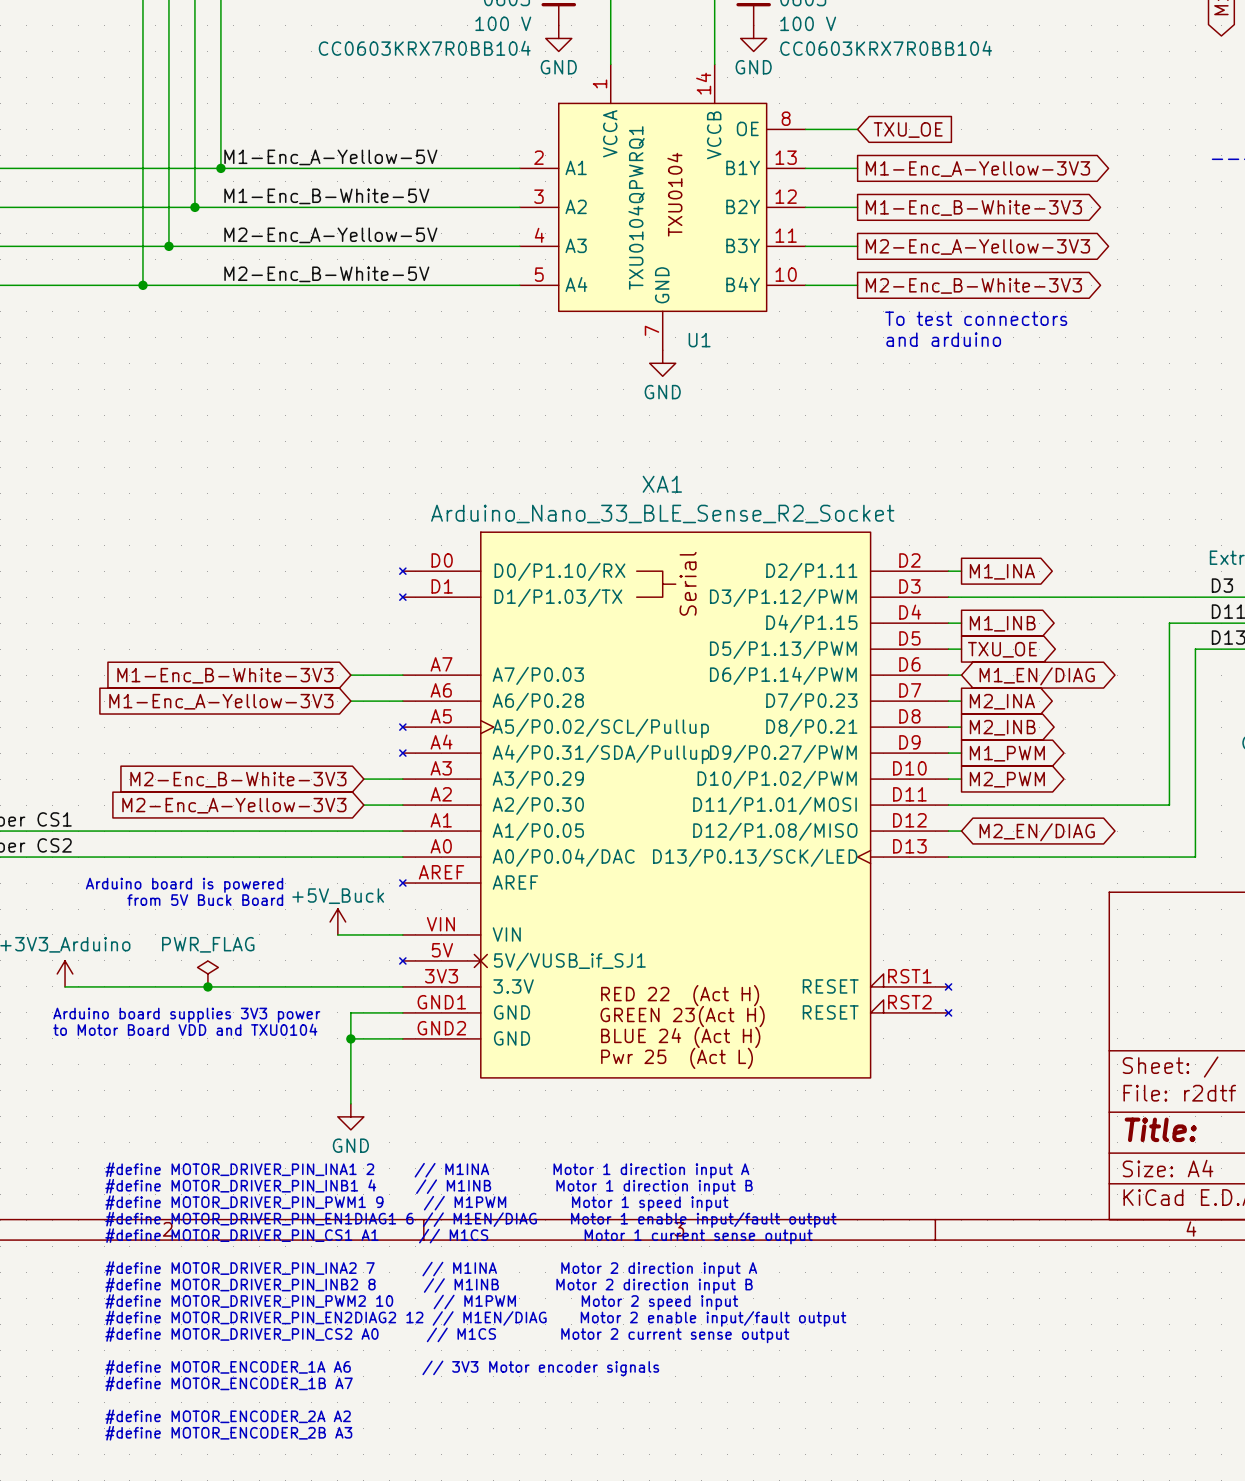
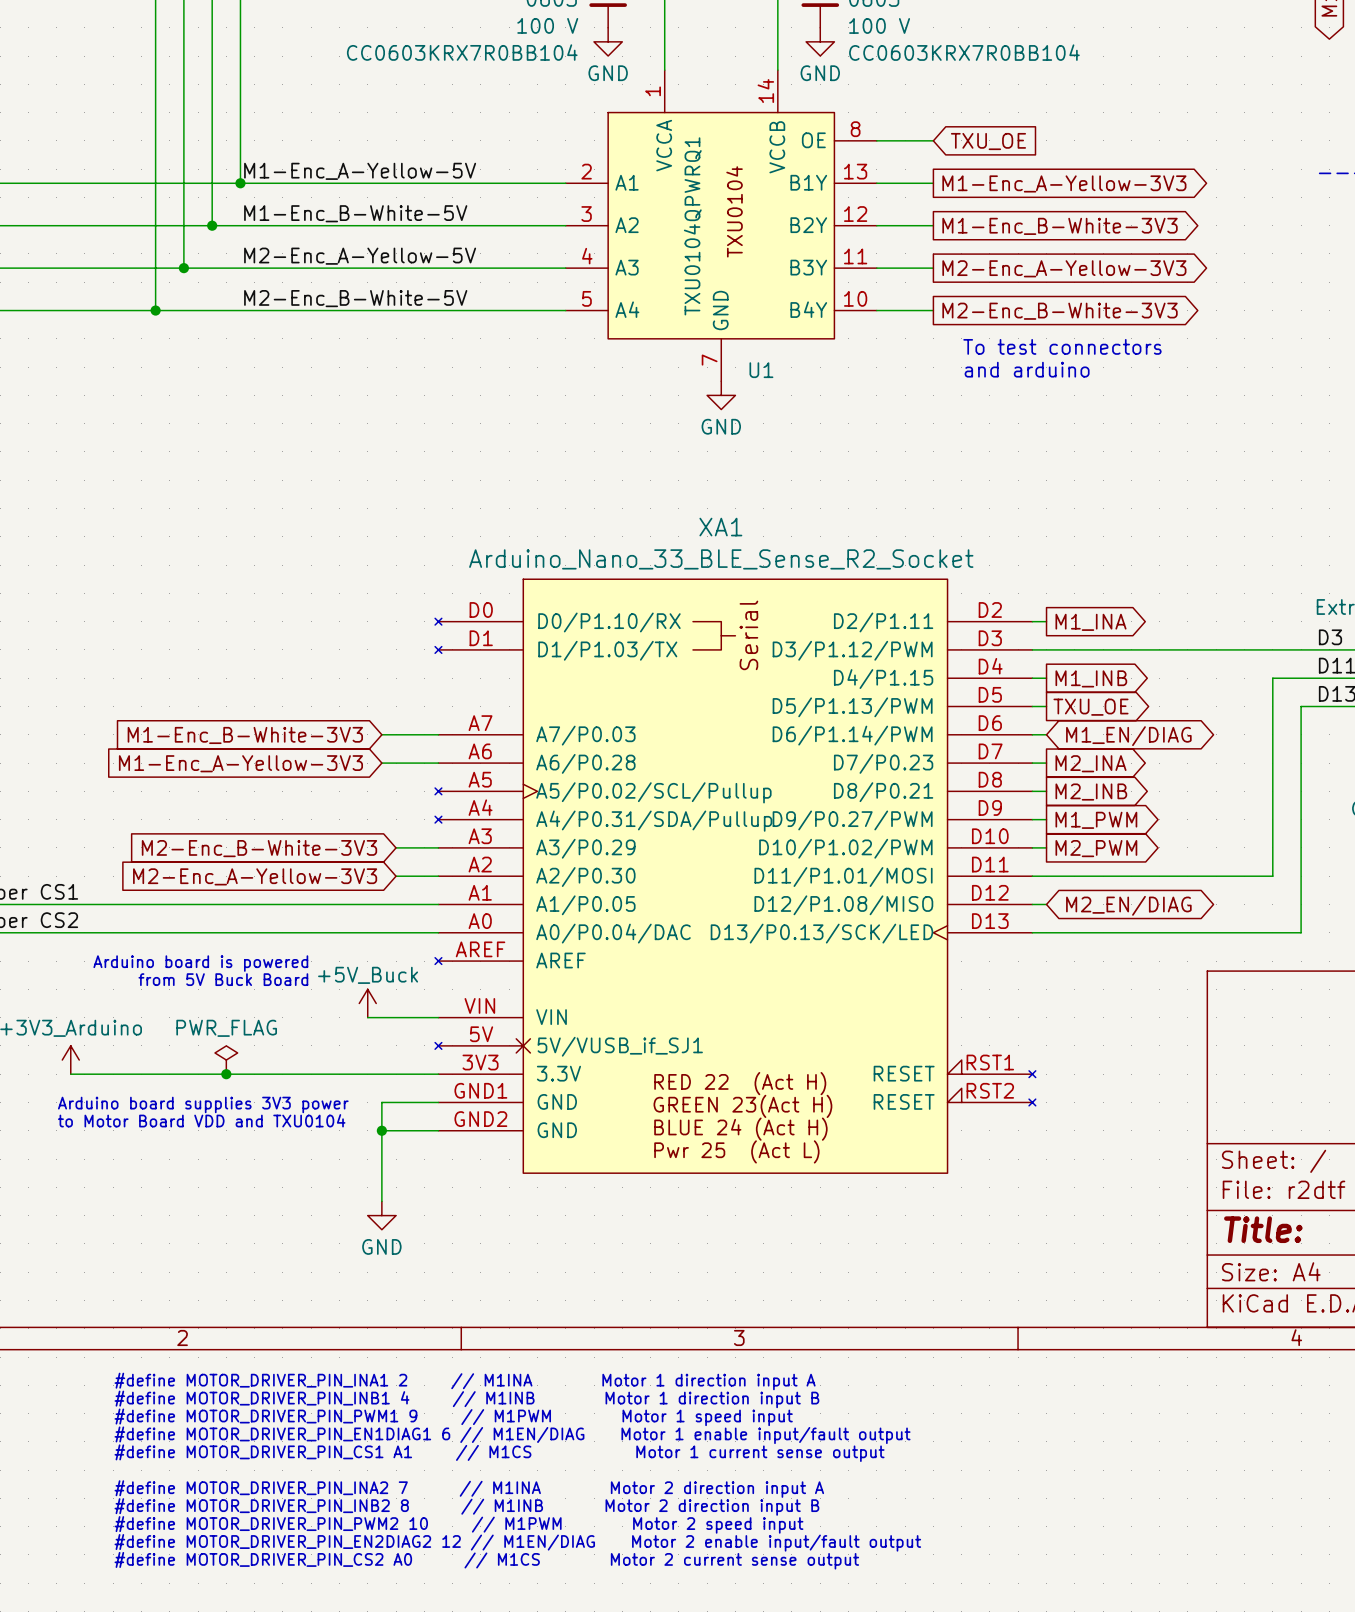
text: #define MOTOR_DRIVER_PIN_INA1 2 // M1INA Motor 1 direction input A (427, 1170) -> none
text: #define MOTOR_DRIVER_PIN_INB1 4 // M1INB Motor 1 direction input B (429, 1186) -> none
text: #define MOTOR_DRIVER_PIN_PWM1 9 // M1PWM Motor 1 speed input (416, 1203) -> none
text: #define MOTOR_DRIVER_PIN_EN1DIAG1 6 // M1EN/DIAG Motor 1 enable input/fault output (470, 1219) -> none
text: #define MOTOR_DRIVER_PIN_CS1 A1 // M1CS Motor 1 current sense output (458, 1236) -> none
text: #define MOTOR_DRIVER_PIN_INA2 7 // M1INA Motor 2 direction input A (431, 1269) -> #define MOTOR_DRIVER_PIN_INA1 2 // M1INA Motor 1 direction input A (465, 1381)
text: #define MOTOR_DRIVER_PIN_INB2 8 // M1INB Motor 2 direction input B (429, 1285) -> #define MOTOR_DRIVER_PIN_INB1 4 // M1INB Motor 1 direction input B (466, 1399)
text: #define MOTOR_DRIVER_PIN_PWM2 10 // M1PWM Motor 2 speed input (421, 1302) -> #define MOTOR_DRIVER_PIN_PWM1 9 // M1PWM Motor 1 speed input (453, 1417)
text: #define MOTOR_DRIVER_PIN_EN2DIAG2 12 // M1EN/DIAG Motor 2 enable input/fault output (475, 1318) -> #define MOTOR_DRIVER_PIN_EN1DIAG1 6 // M1EN/DIAG Motor 1 enable input/fault output (512, 1435)
text: #define MOTOR_DRIVER_PIN_CS2 A0 // M1CS Motor 2 current sense output (447, 1335) -> #define MOTOR_DRIVER_PIN_CS1 A1 // M1CS Motor 1 current sense output (499, 1453)
text: #define MOTOR_ENCODER_1A A6 // 3V3 Motor encoder signals (382, 1368) -> #define MOTOR_DRIVER_PIN_INA2 7 // M1INA Motor 2 direction input A (469, 1489)
text: #define MOTOR_ENCODER_1B A7 (229, 1383) -> #define MOTOR_DRIVER_PIN_INB2 8 // M1INB Motor 2 direction input B (466, 1506)
text: none -> #define MOTOR_DRIVER_PIN_PWM2 10 // M1PWM Motor 2 speed input (458, 1524)
text: #define MOTOR_ENCODER_2A A2 (228, 1416) -> #define MOTOR_DRIVER_PIN_EN2DIAG2 12 // M1EN/DIAG Motor 2 enable input/fault output (517, 1542)
text: #define MOTOR_ENCODER_2B A3 (228, 1433) -> #define MOTOR_DRIVER_PIN_CS2 A0 // M1CS Motor 2 current sense output (486, 1560)

